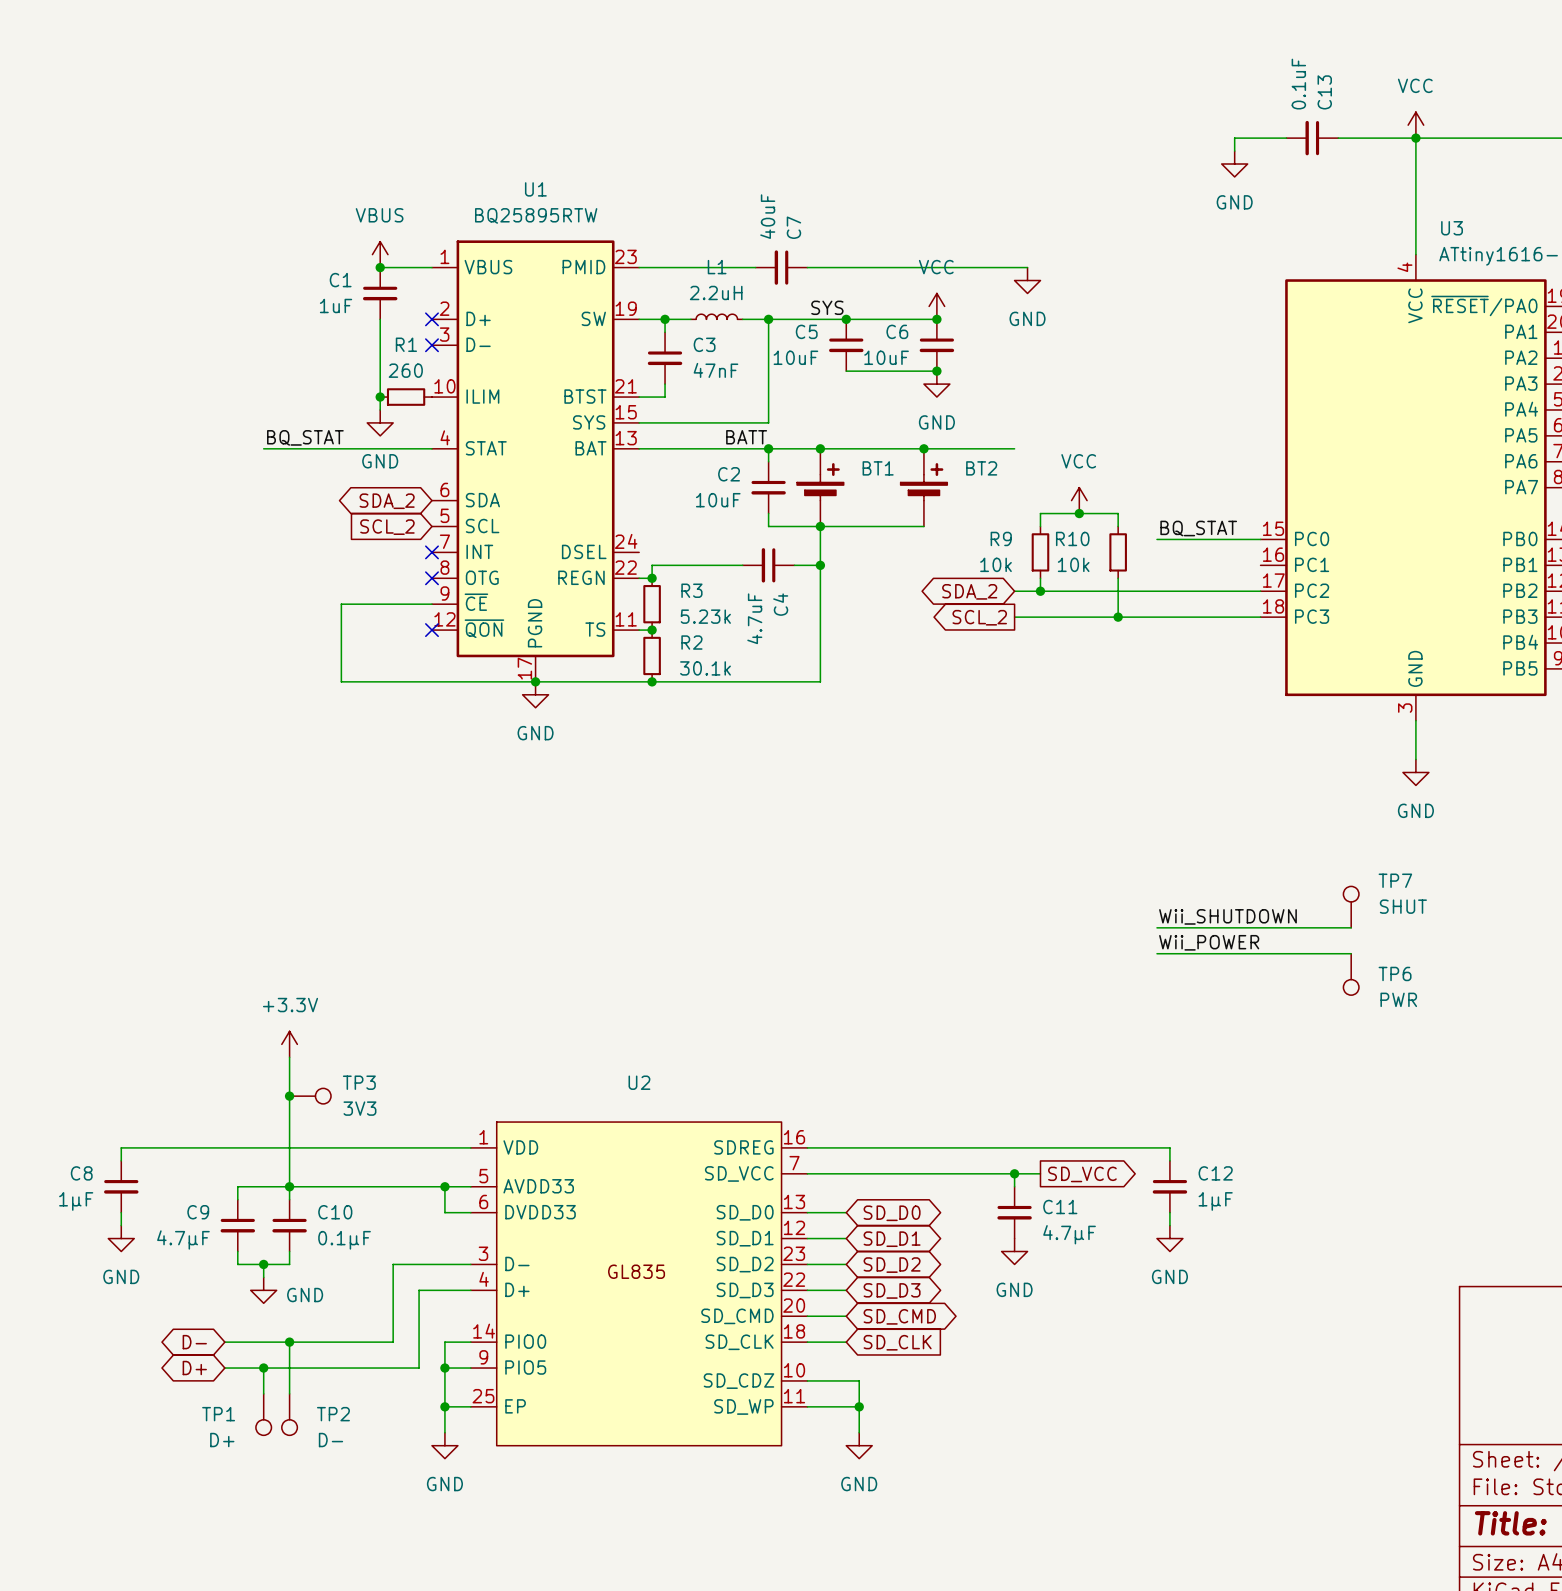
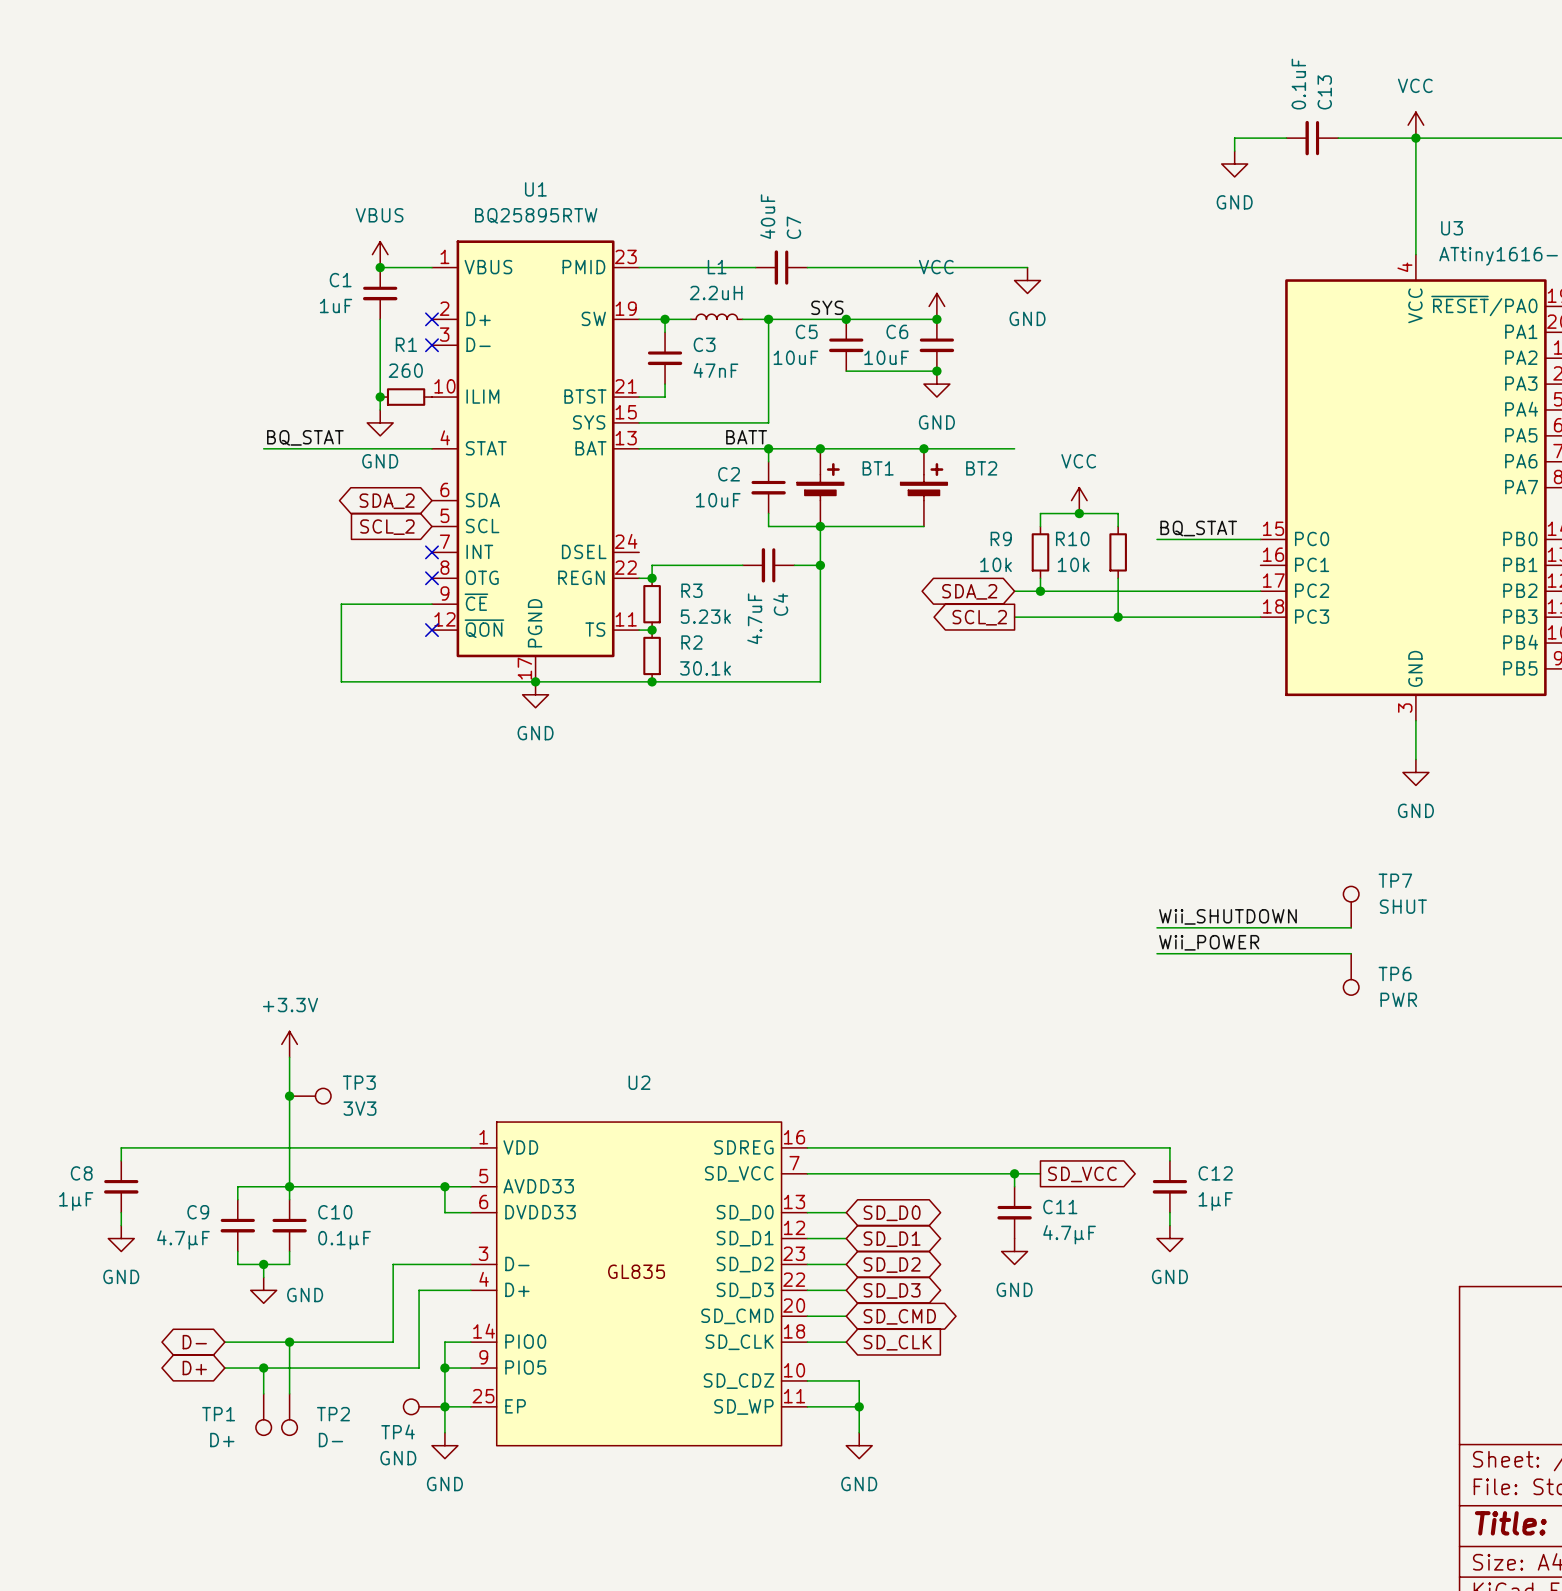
TP4: none -> GND (424, 1406)

